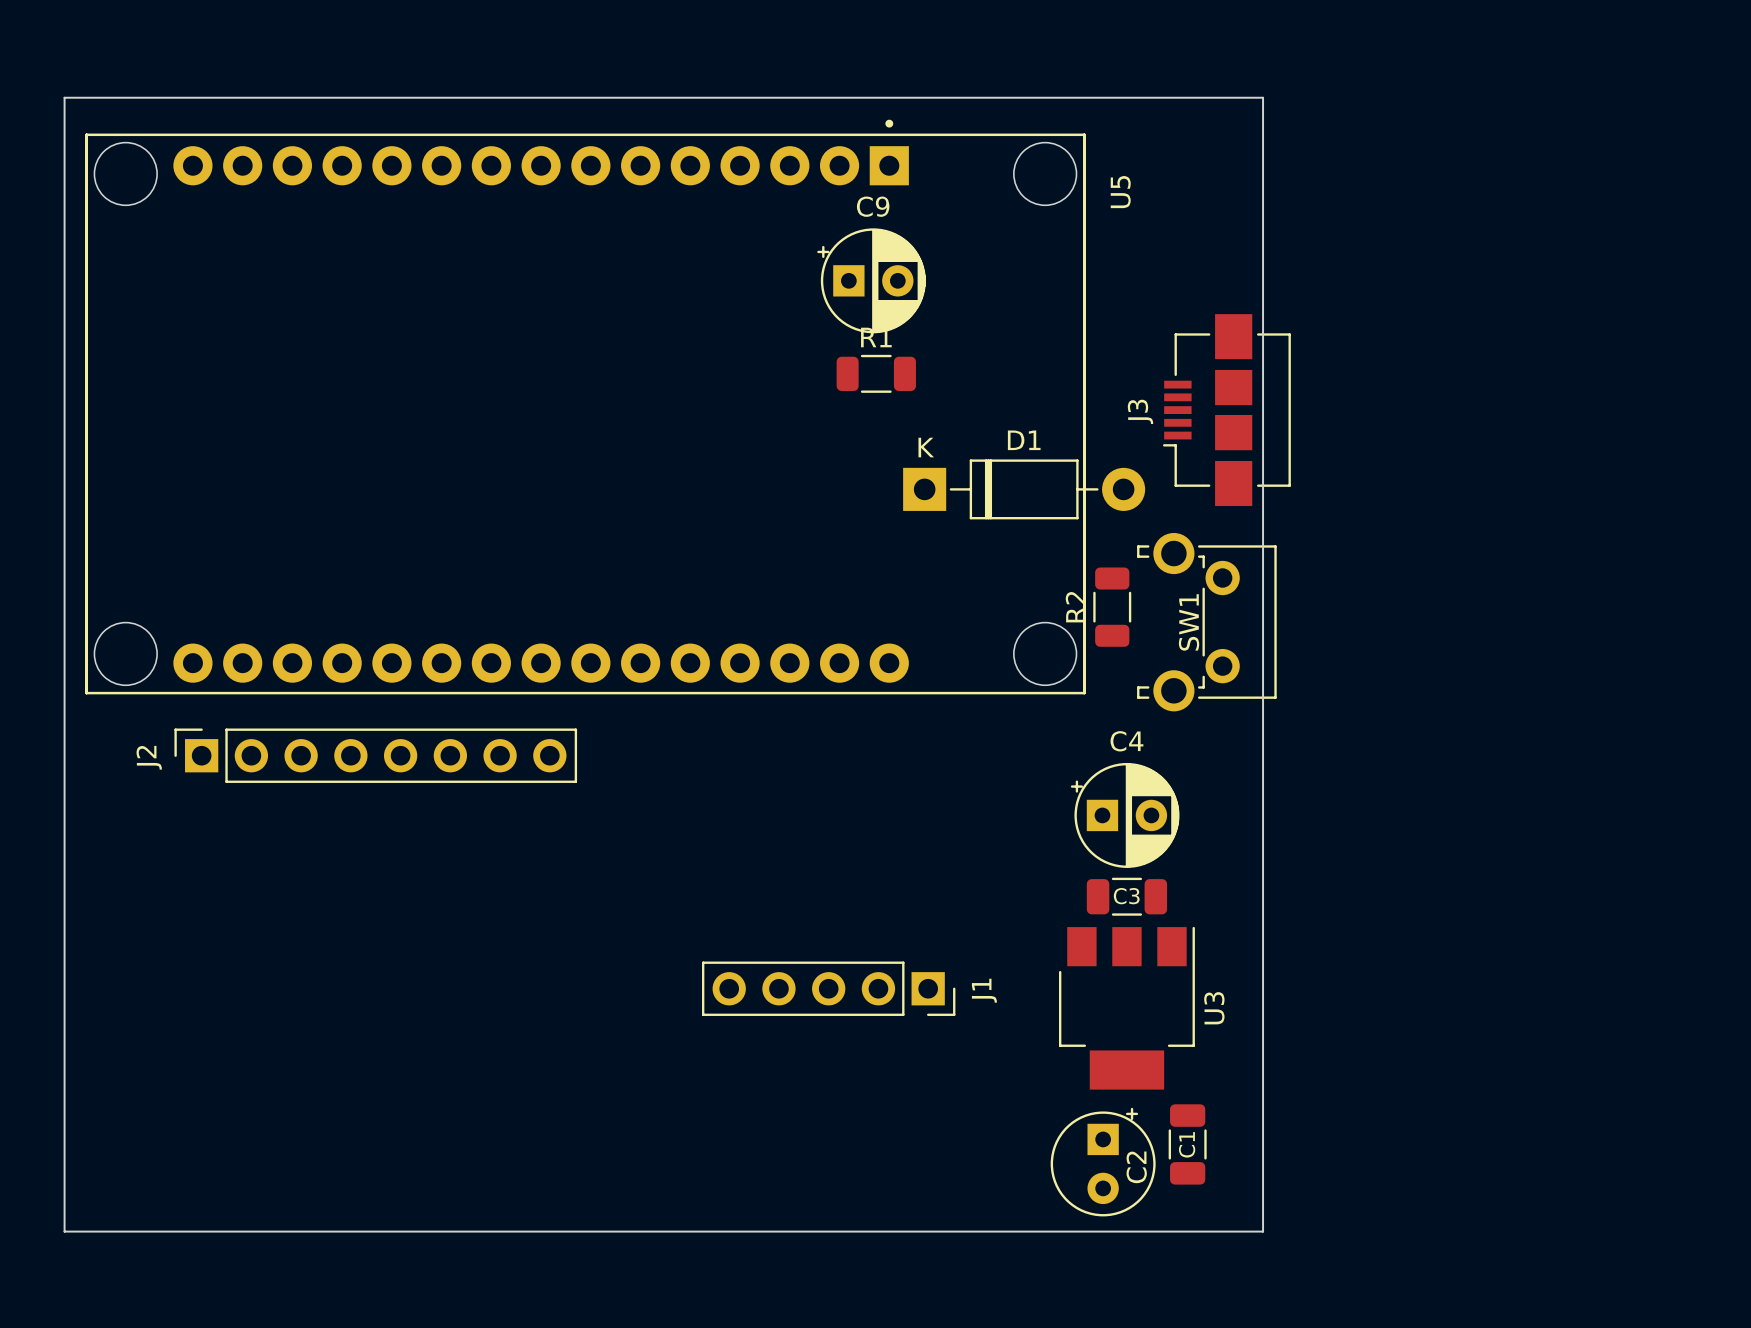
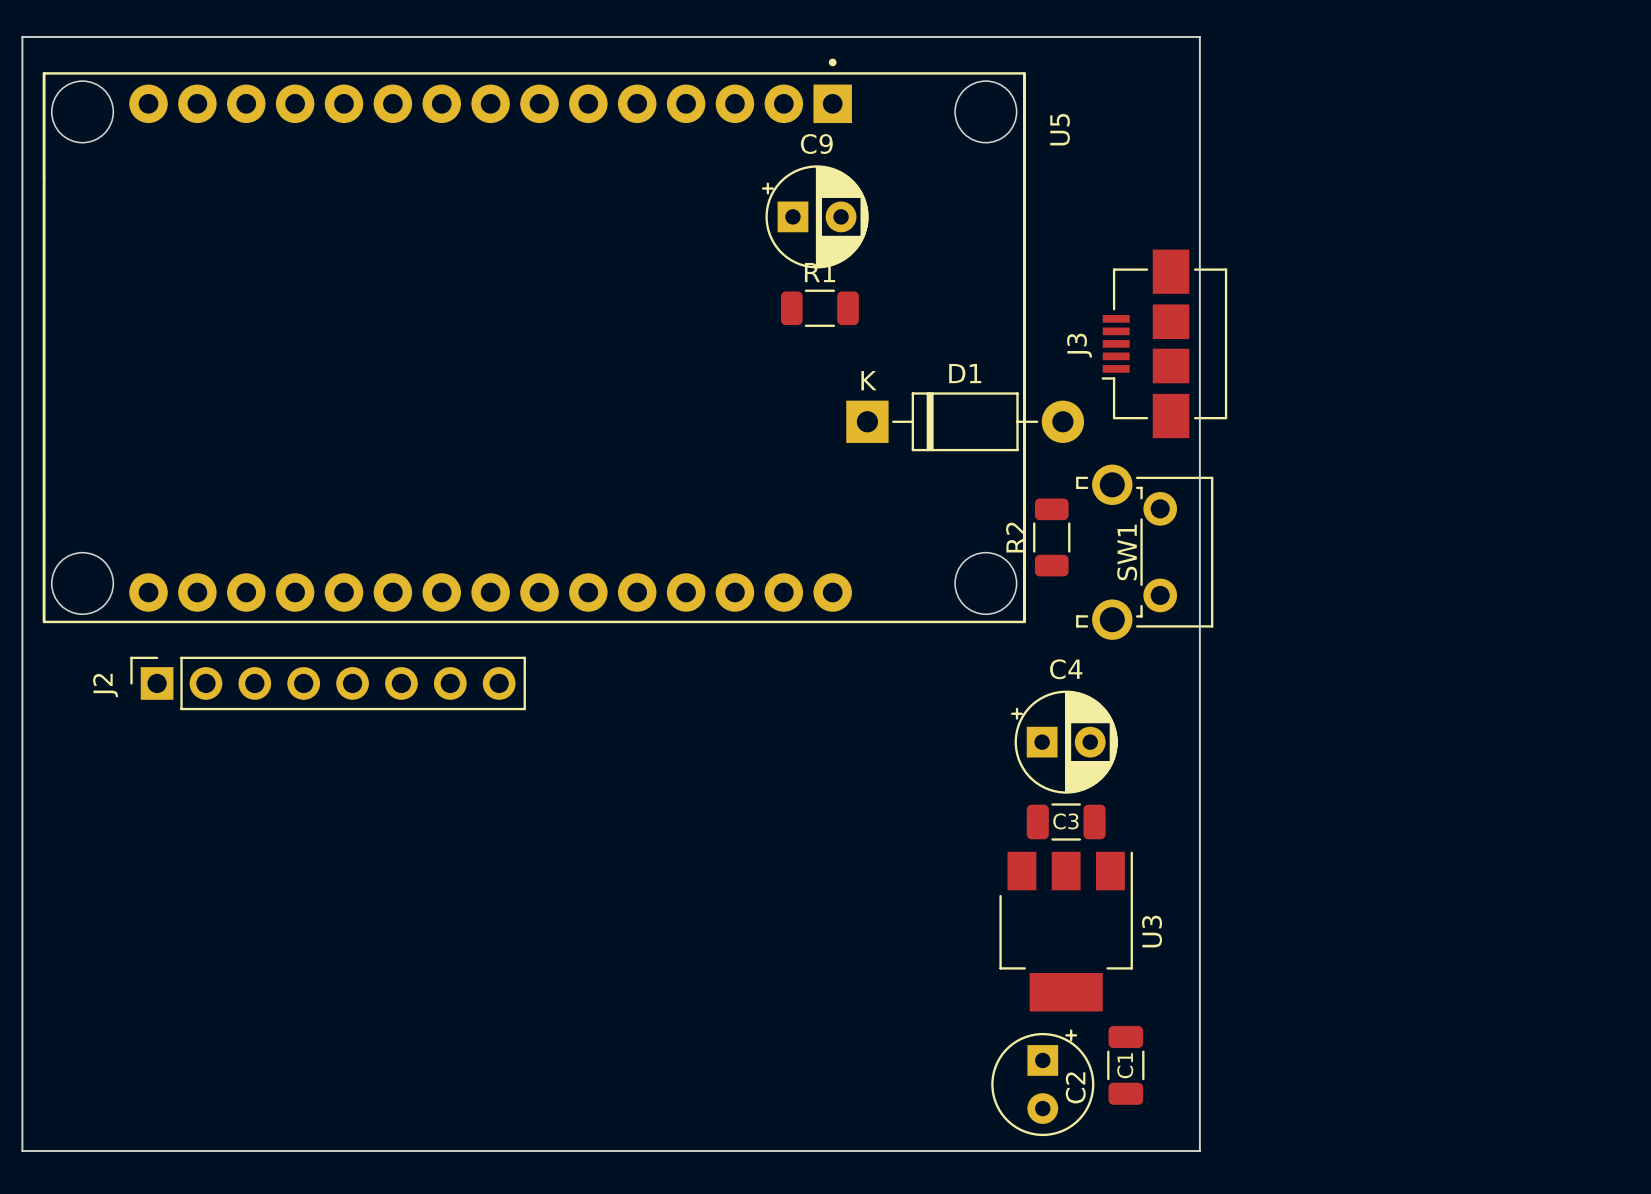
J1: (828, 988) -> none

